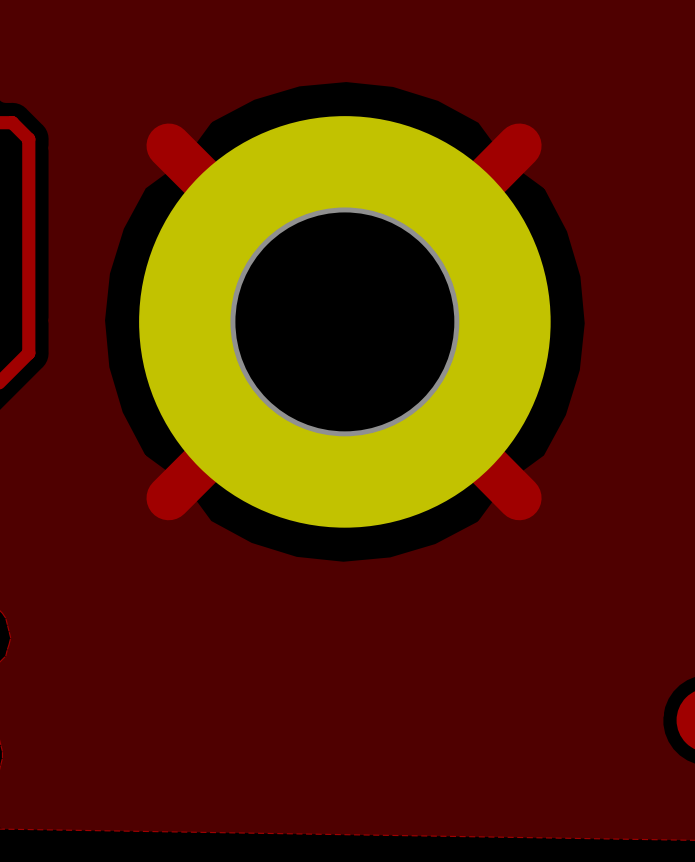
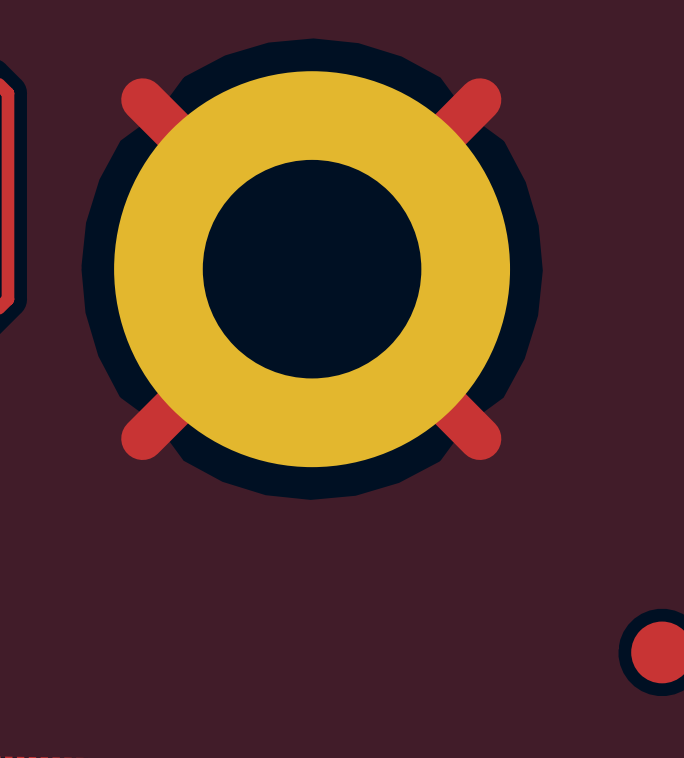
part footprint: [139, 116, 551, 528] -> [114, 71, 511, 468]

